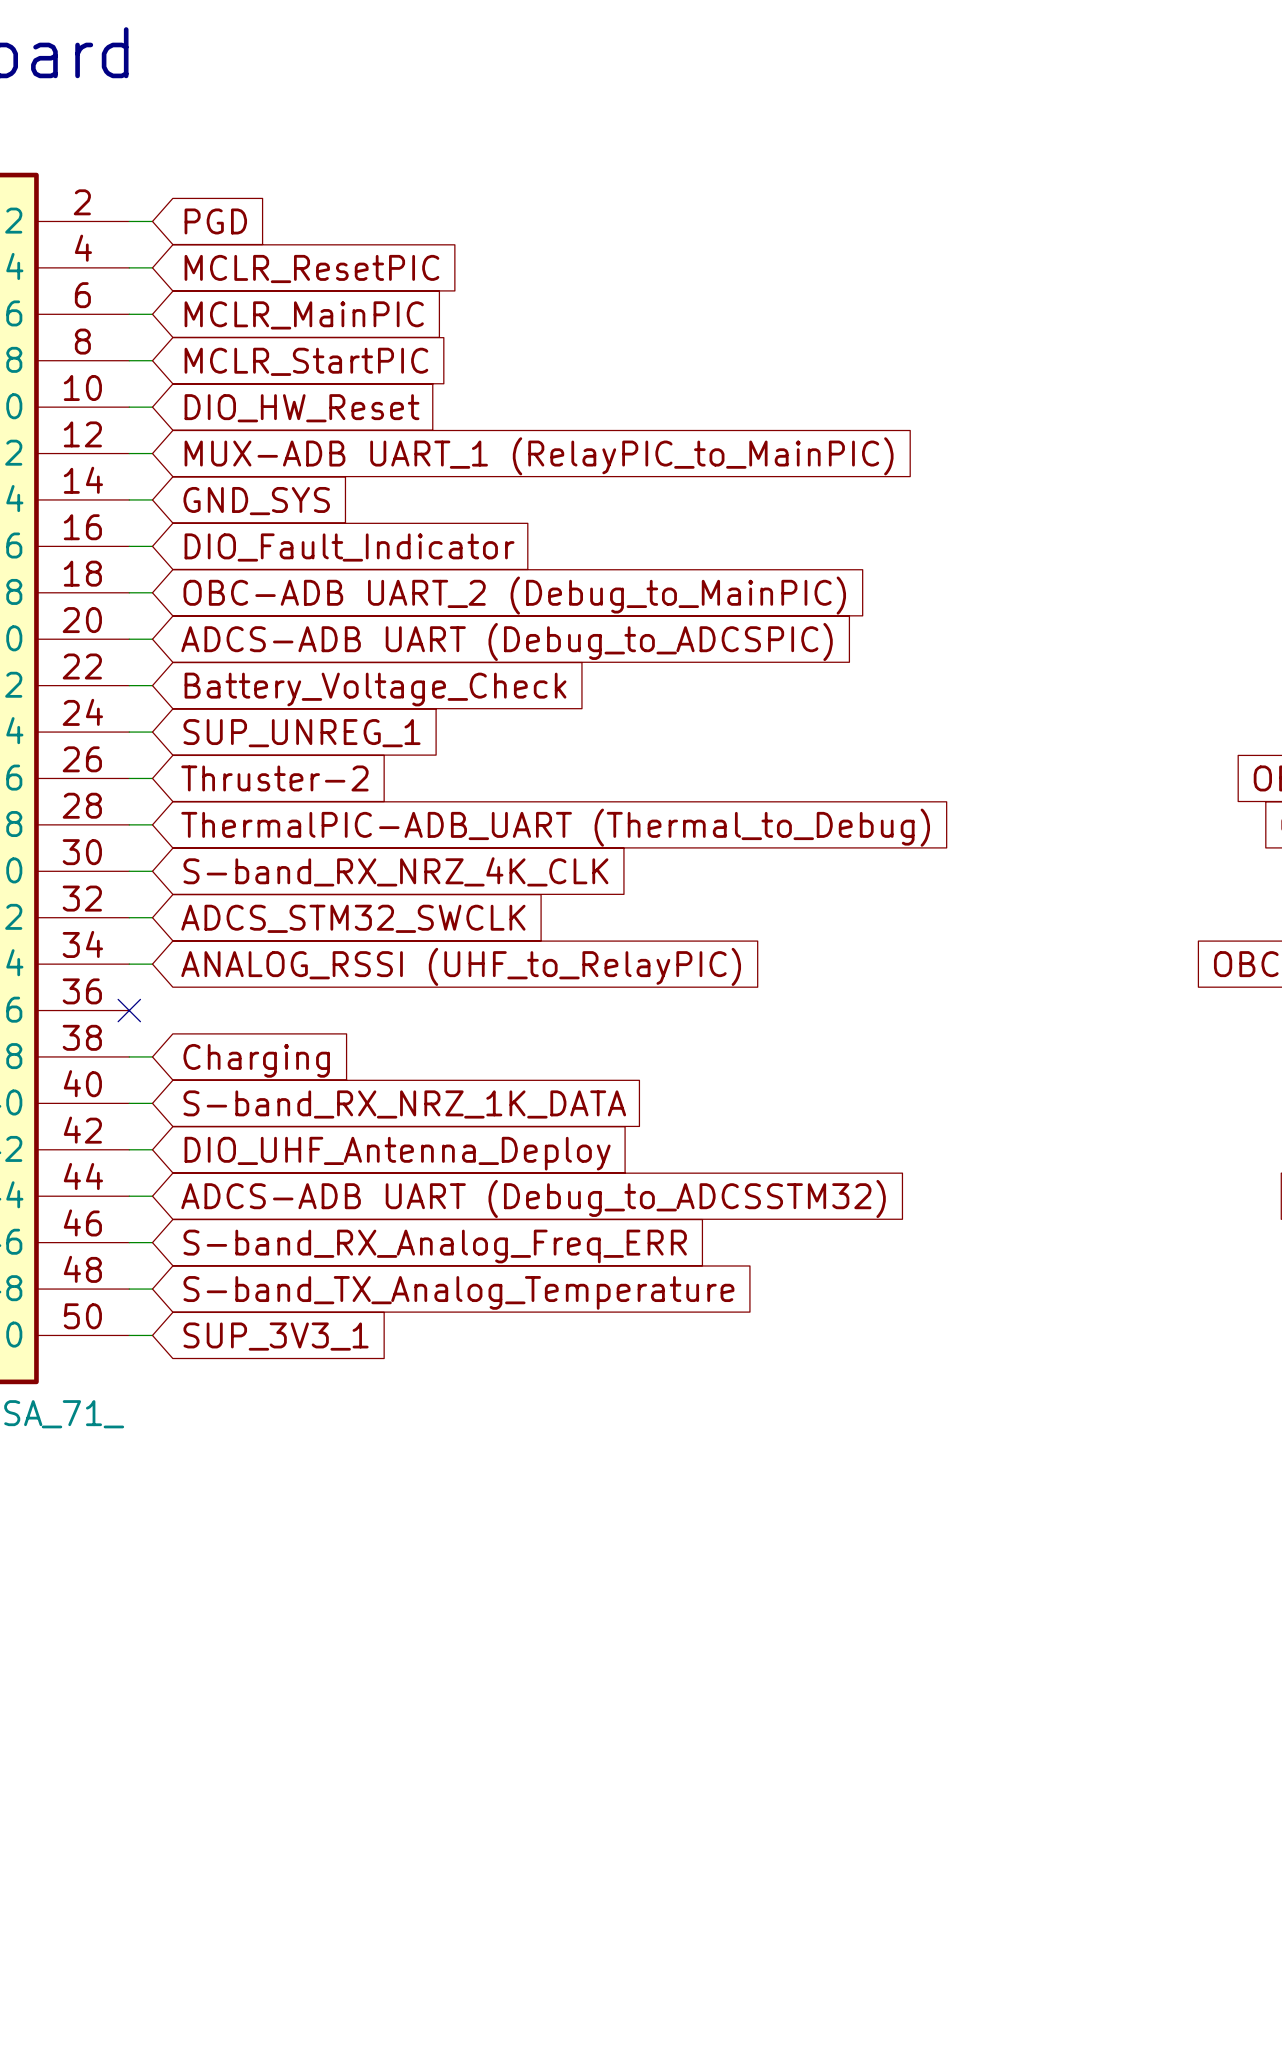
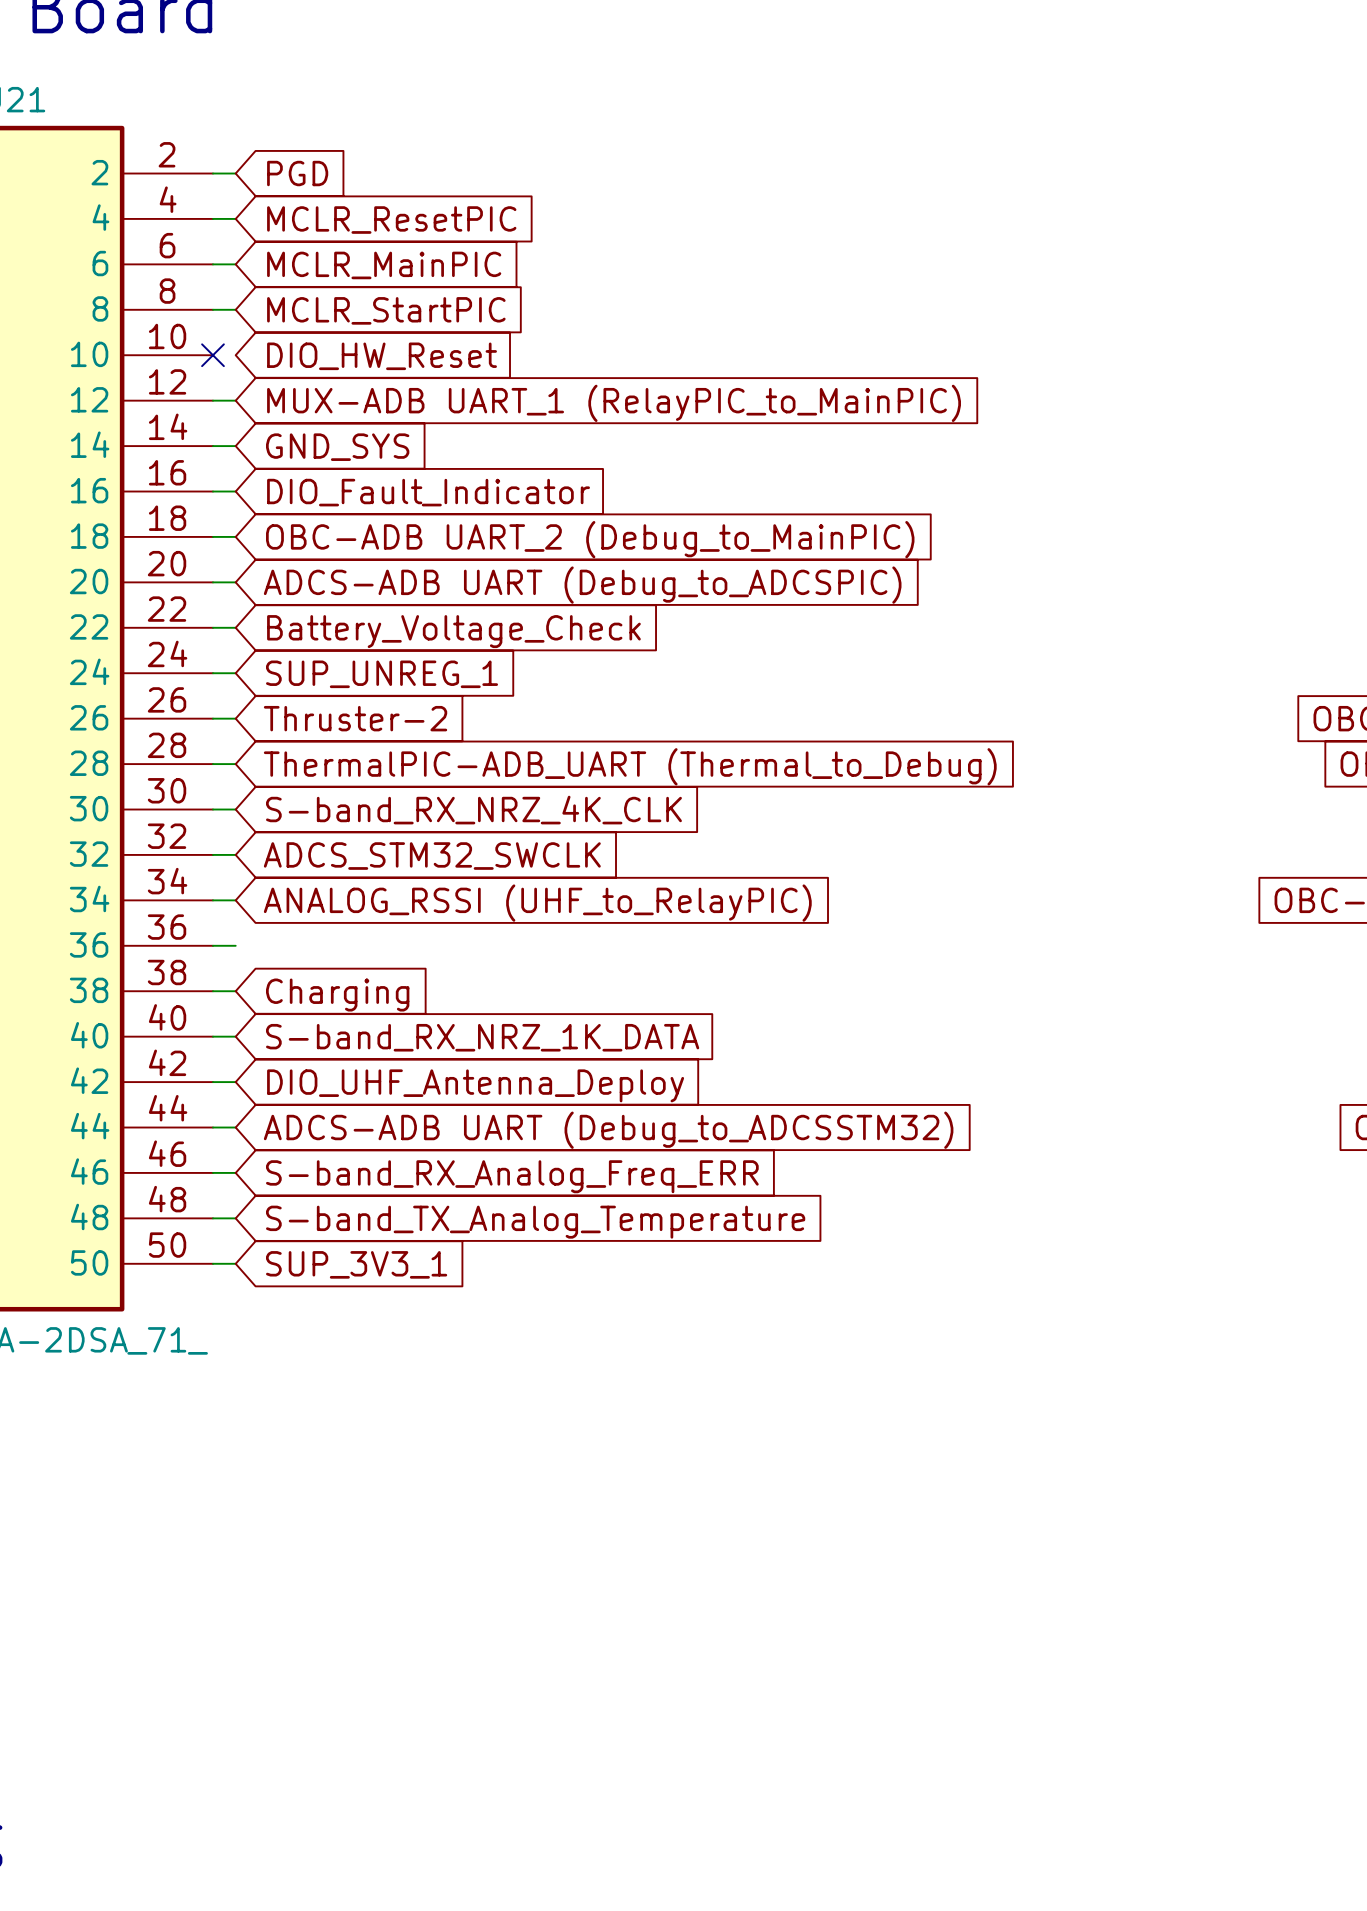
wire: (129, 407) (152, 407) -> none
no-connect mark: none -> (212, 355)
wire: none -> (212, 945) (235, 945)
no-connect mark: (129, 1010) -> none

